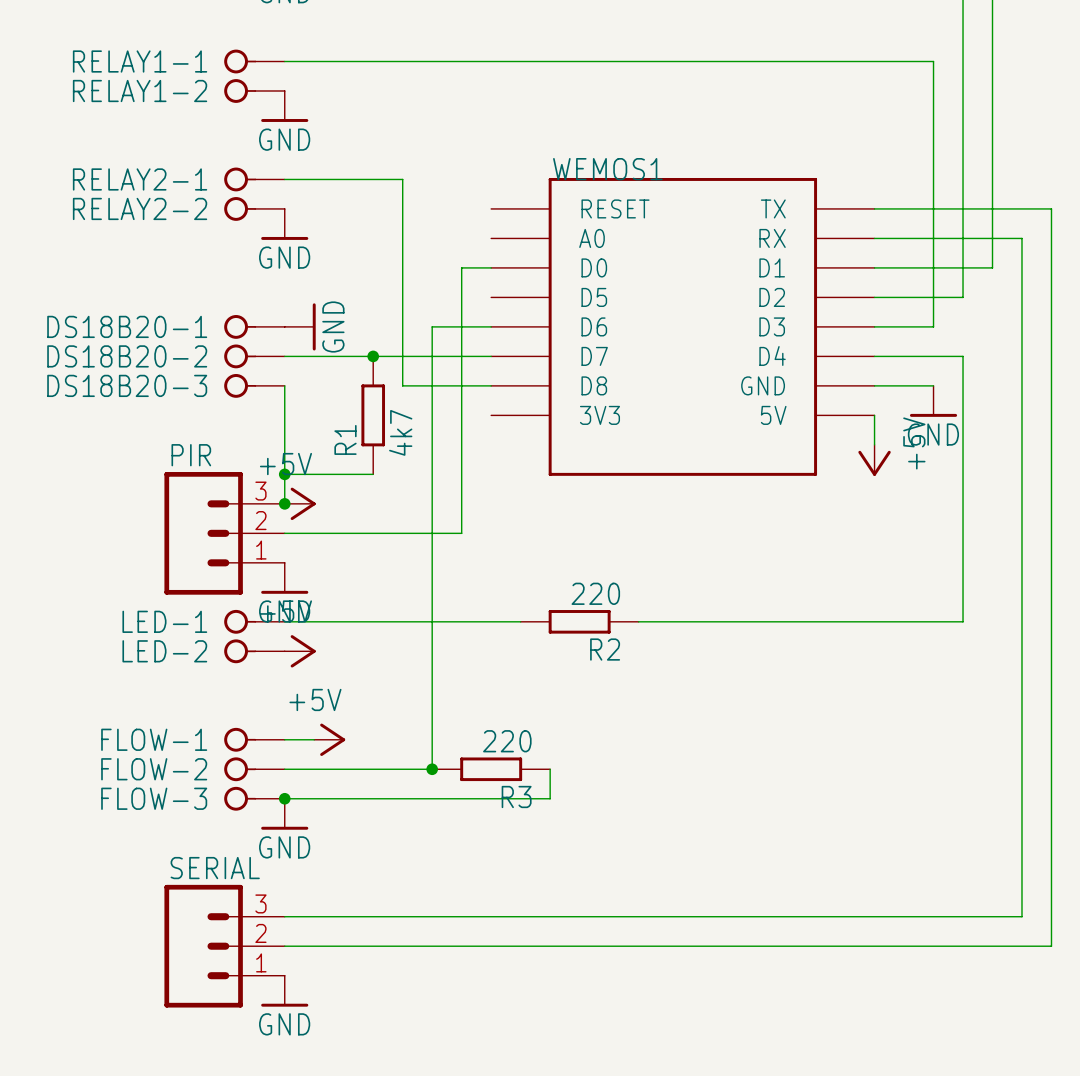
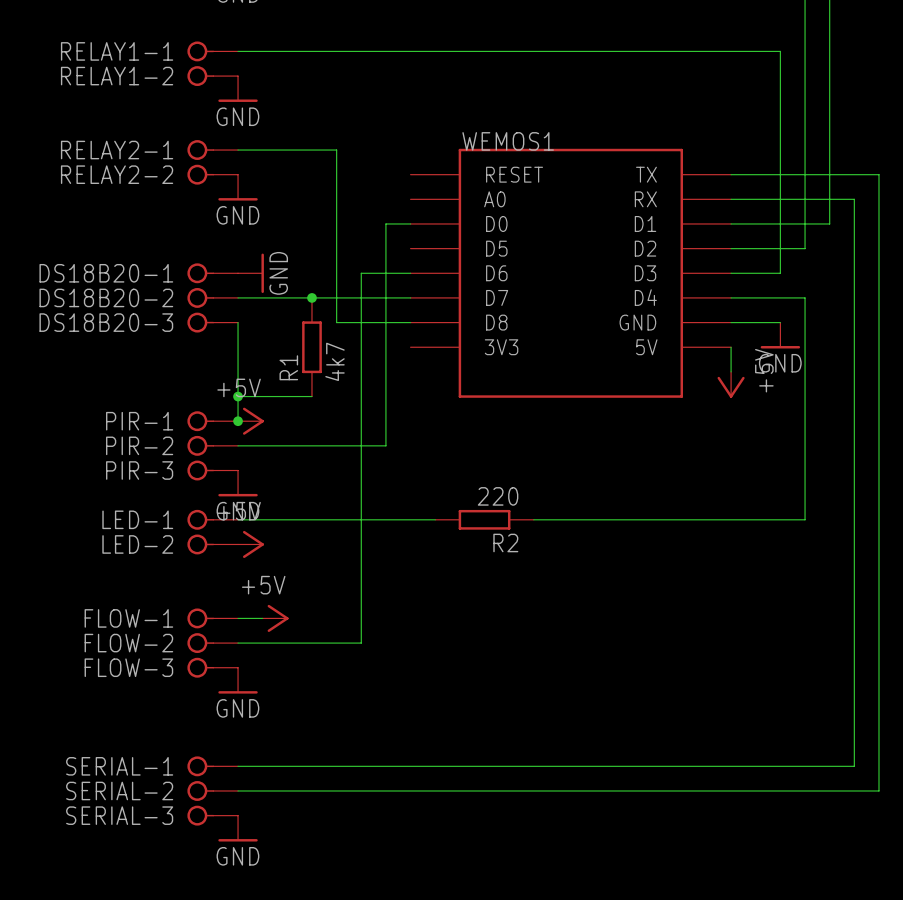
PIR-1: none -> (212, 421)
PIR: (224, 533) -> none
PIR-2: none -> (212, 445)
PIR-3: none -> (212, 470)
junction: (432, 769) -> none
R3: 220 (491, 769) -> none
wire: (550, 769) (550, 798) (284, 798) -> none
junction: (284, 798) -> none
SERIAL-1: none -> (212, 766)
SERIAL: (224, 946) -> none
SERIAL-2: none -> (212, 790)
SERIAL-3: none -> (212, 815)

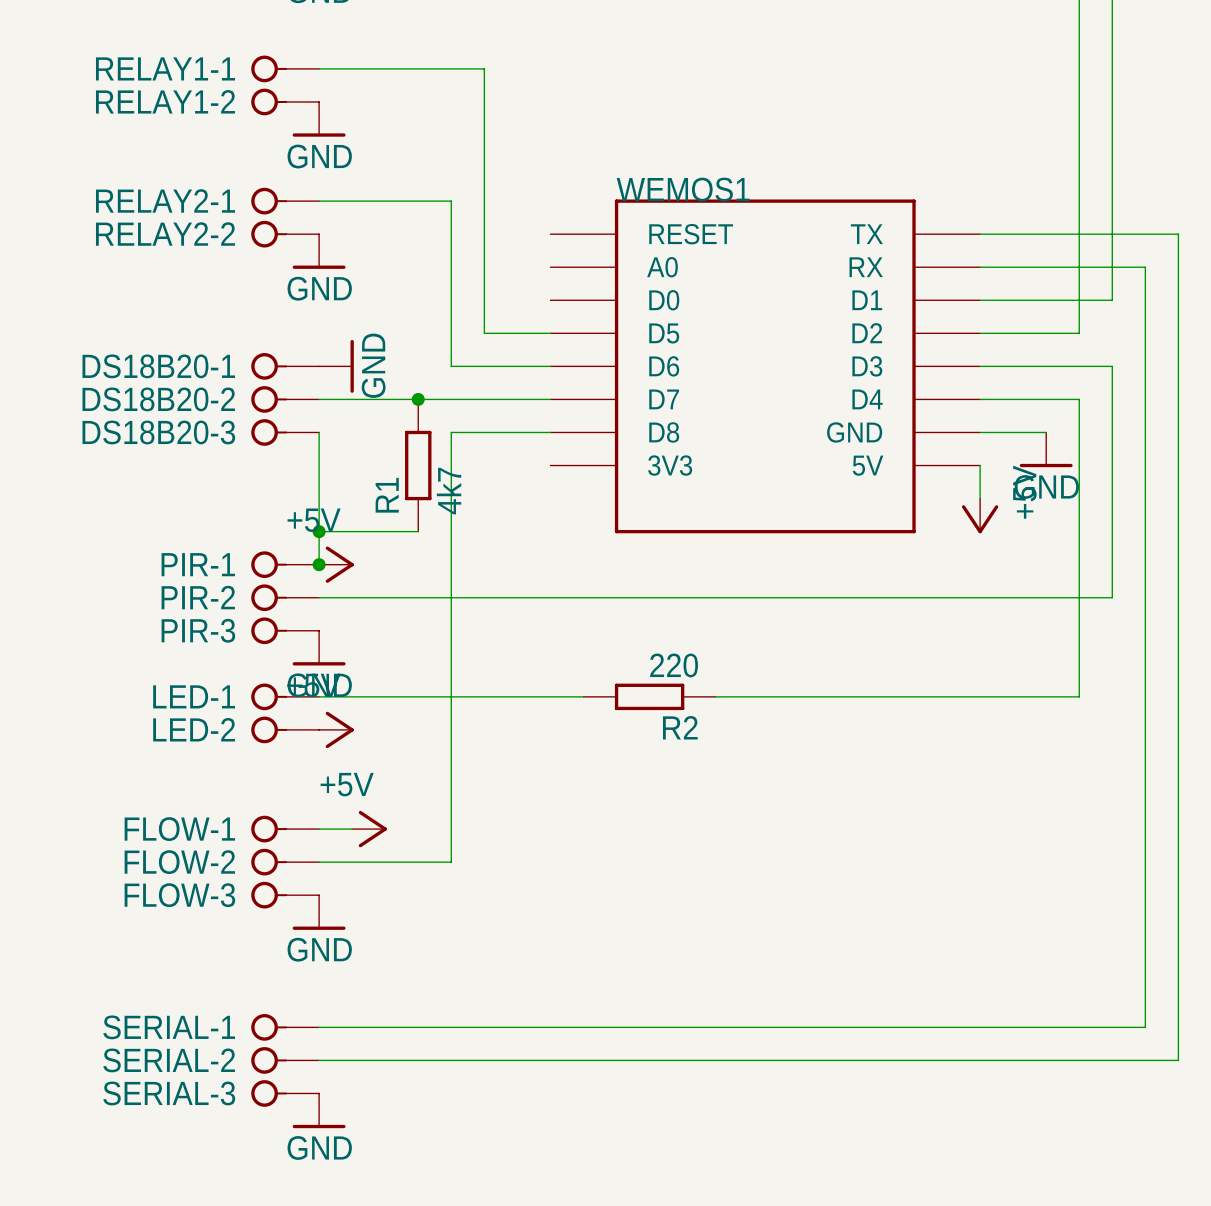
wire: (361, 51) (780, 51) (780, 273) -> (484, 68) (484, 333) (550, 333)
wire: (410, 223) (385, 223) (385, 445) -> (1046, 366) (1112, 366) (1112, 597) (517, 597)
wire: (336, 273) (336, 322) -> (451, 366) (484, 366)
wire: (361, 273) (361, 643) (336, 643) -> (451, 432) (451, 862)

